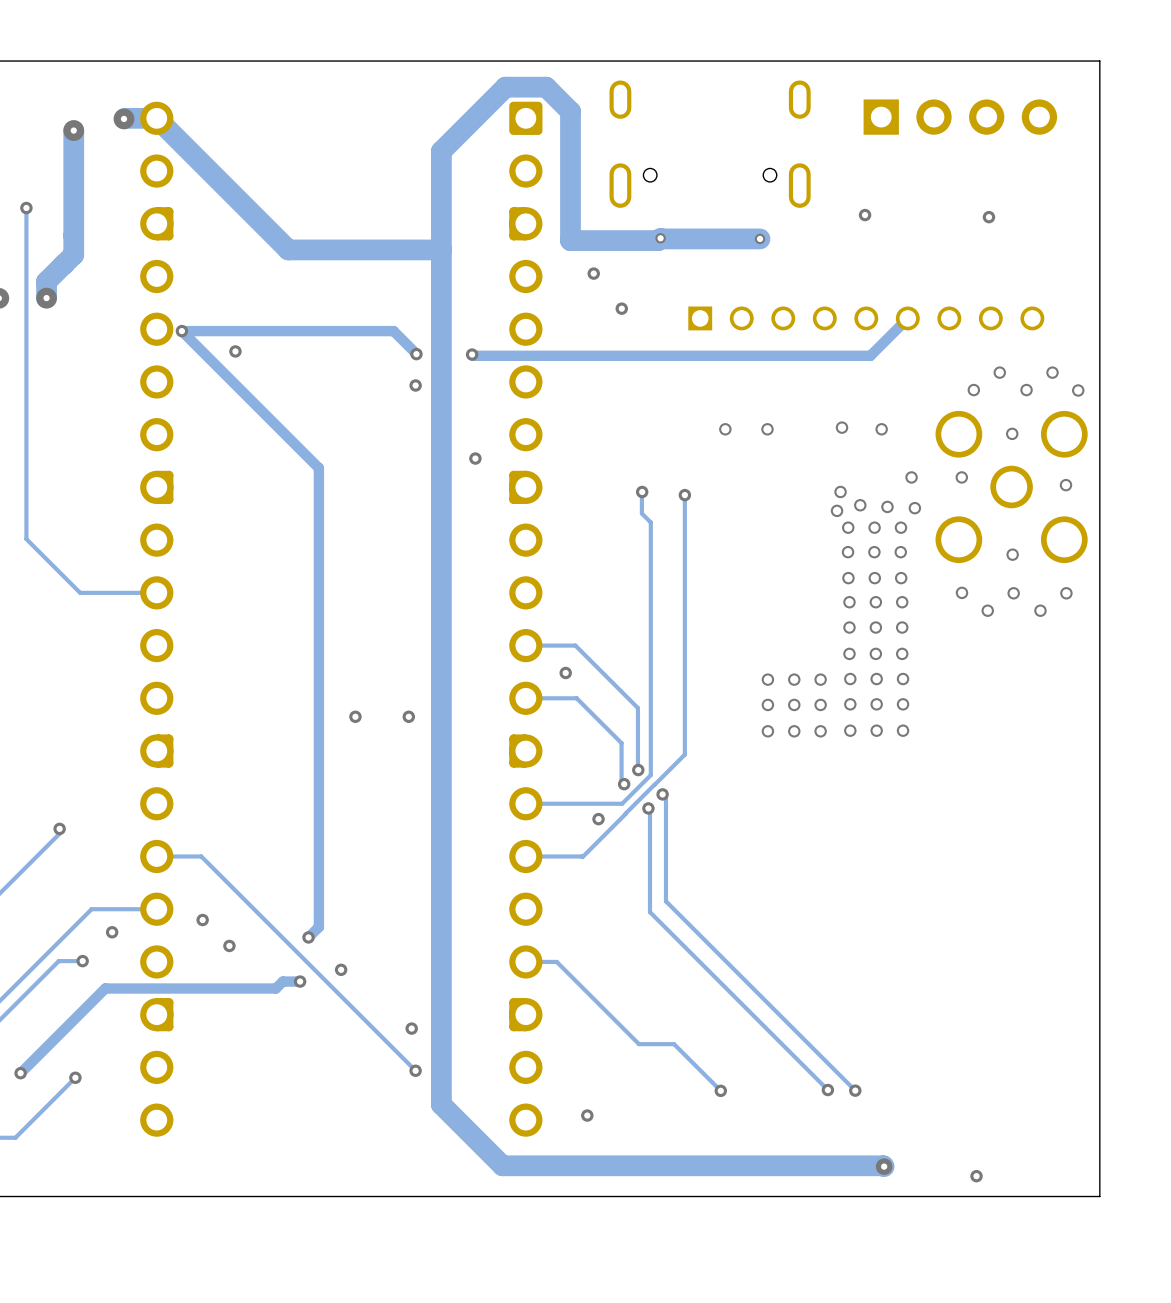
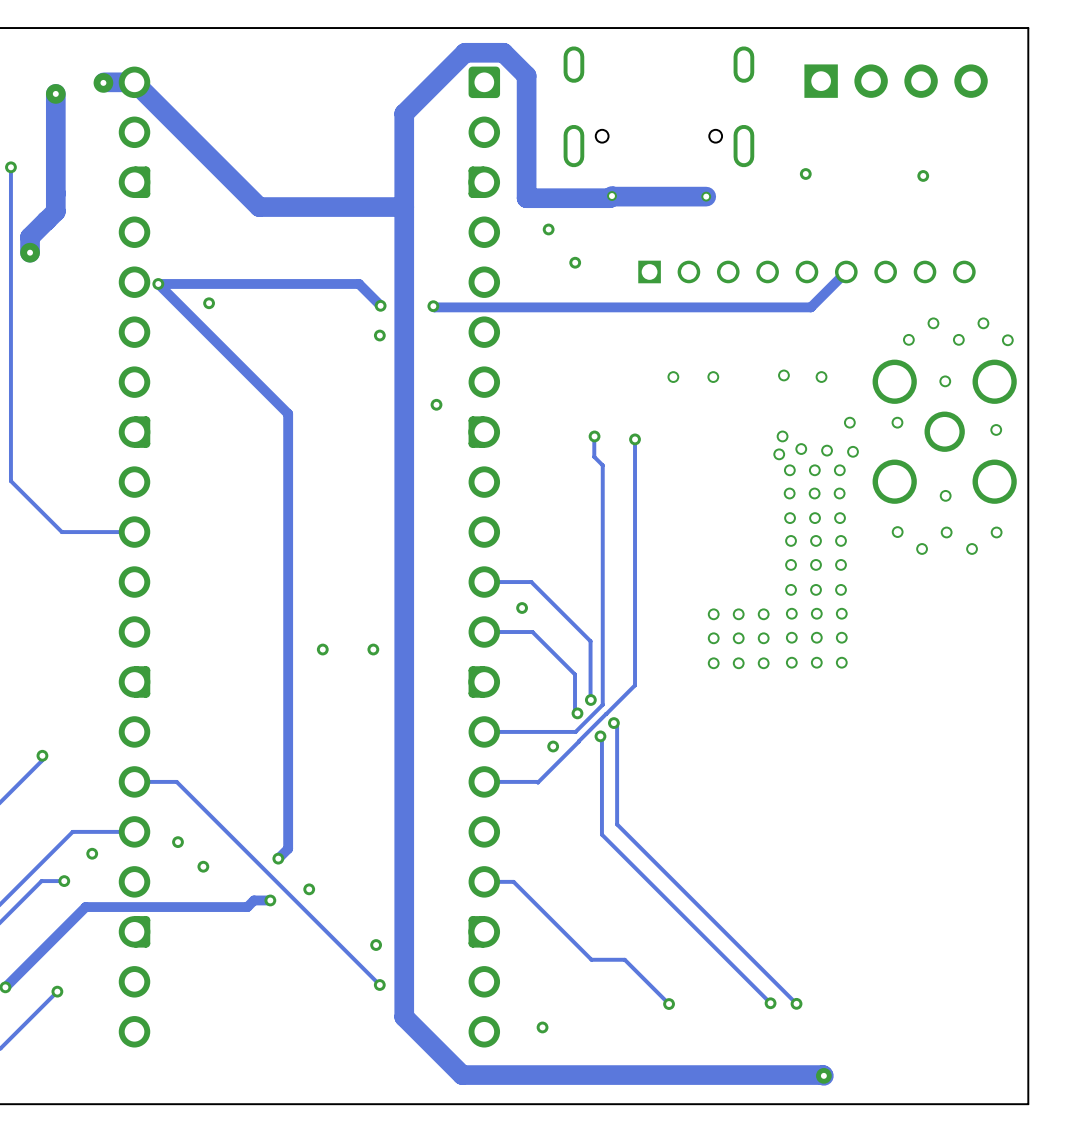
via: (976, 1176) -> none

